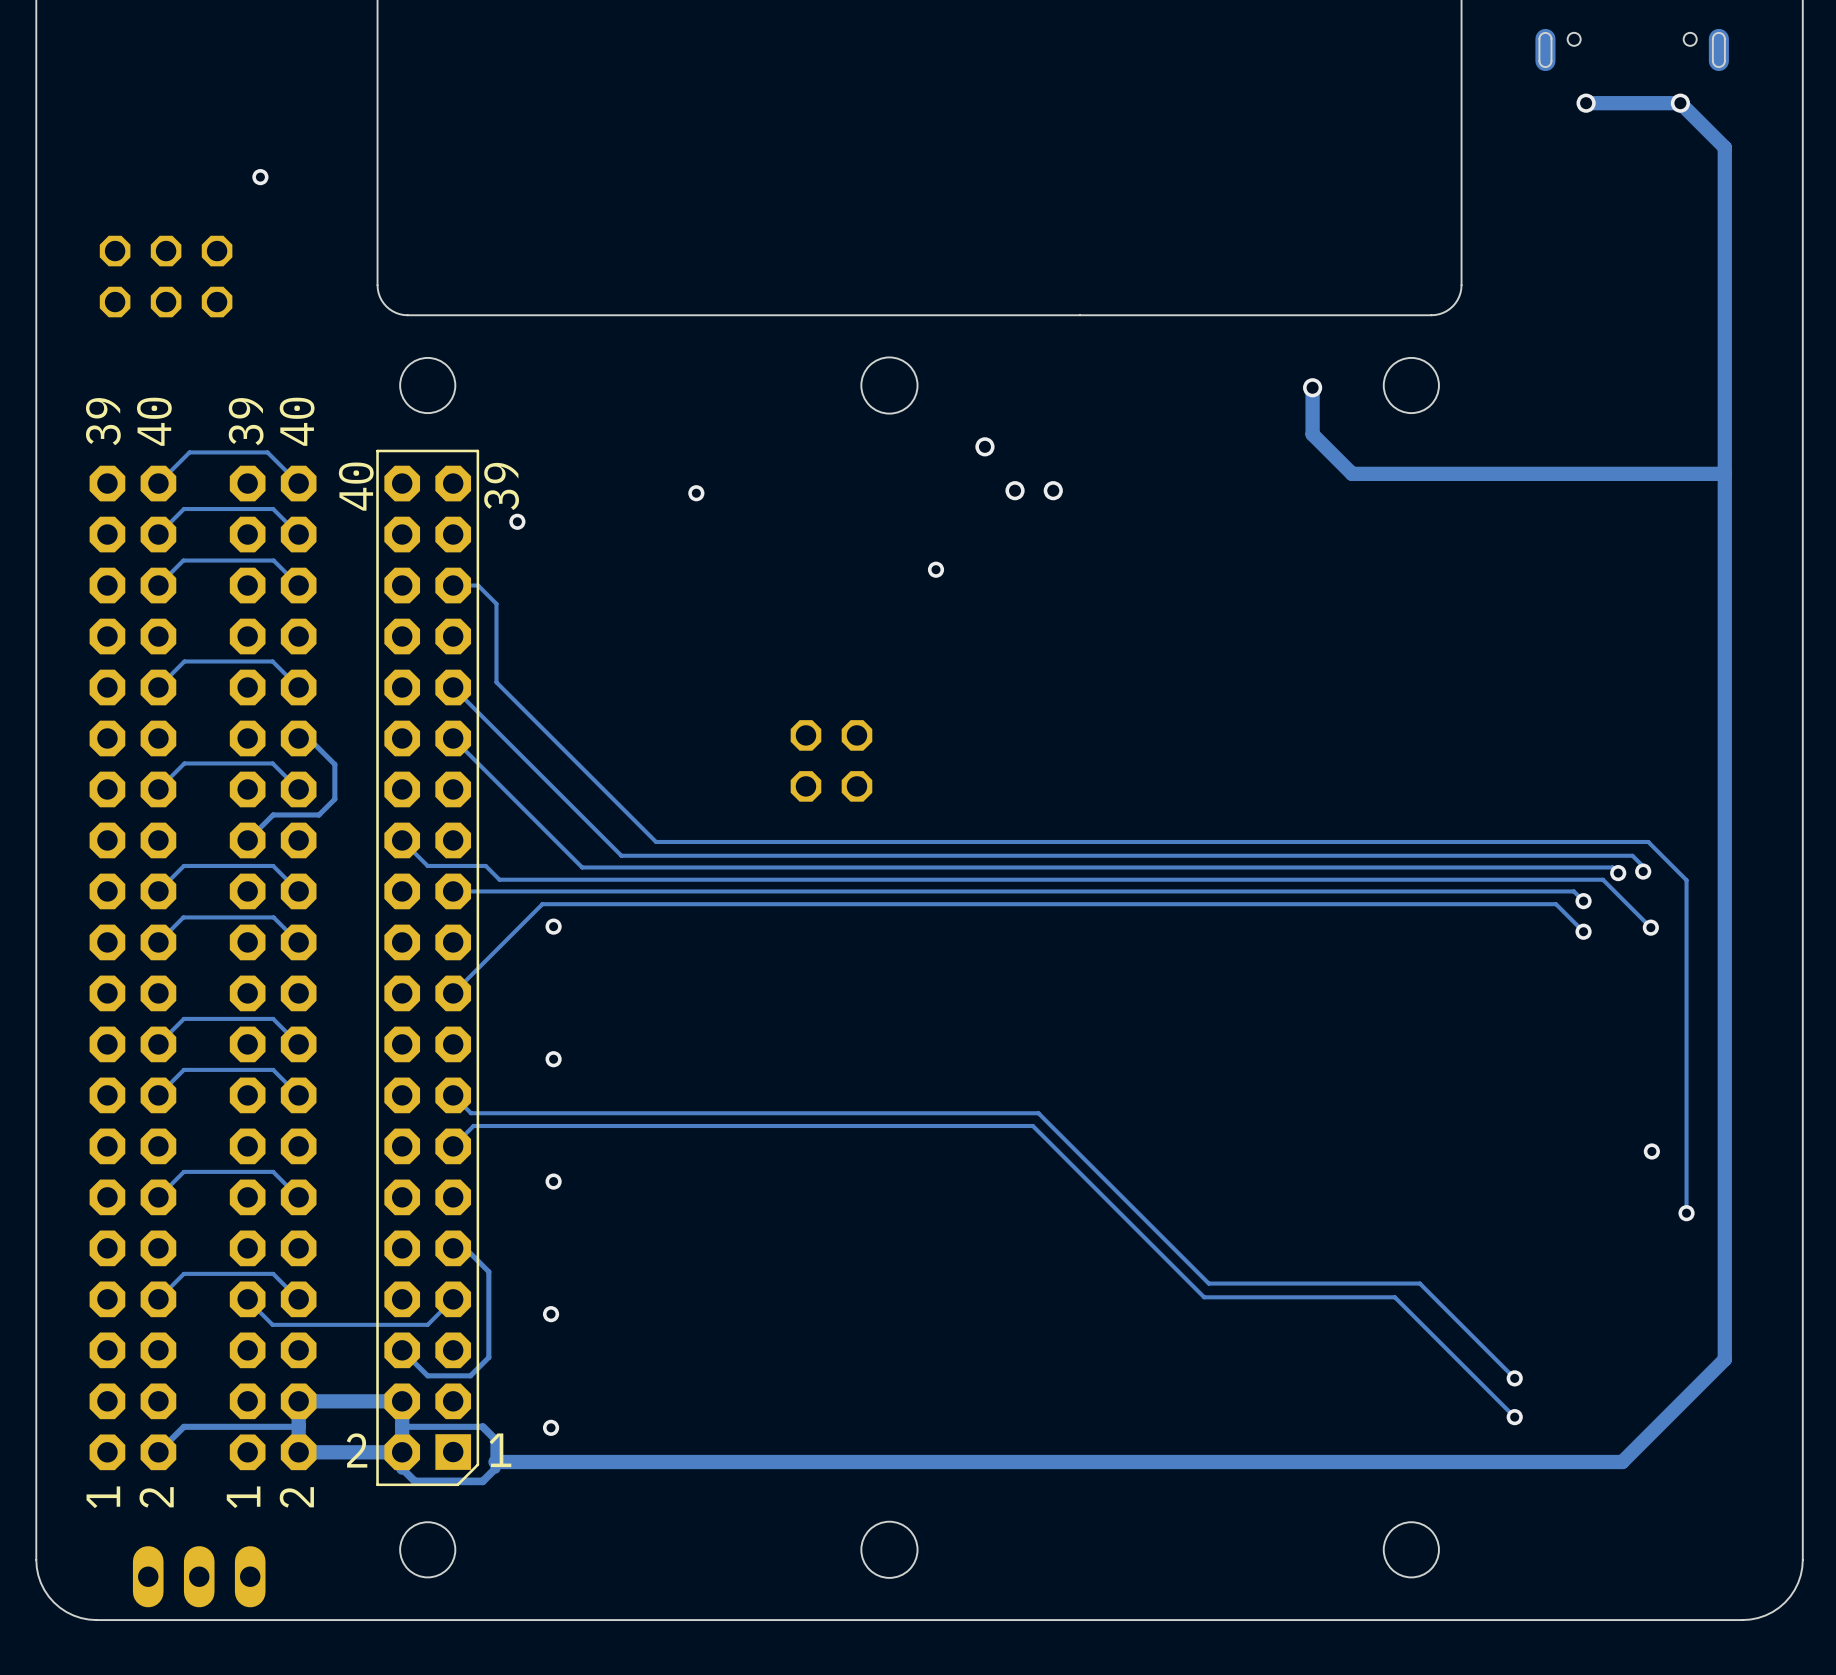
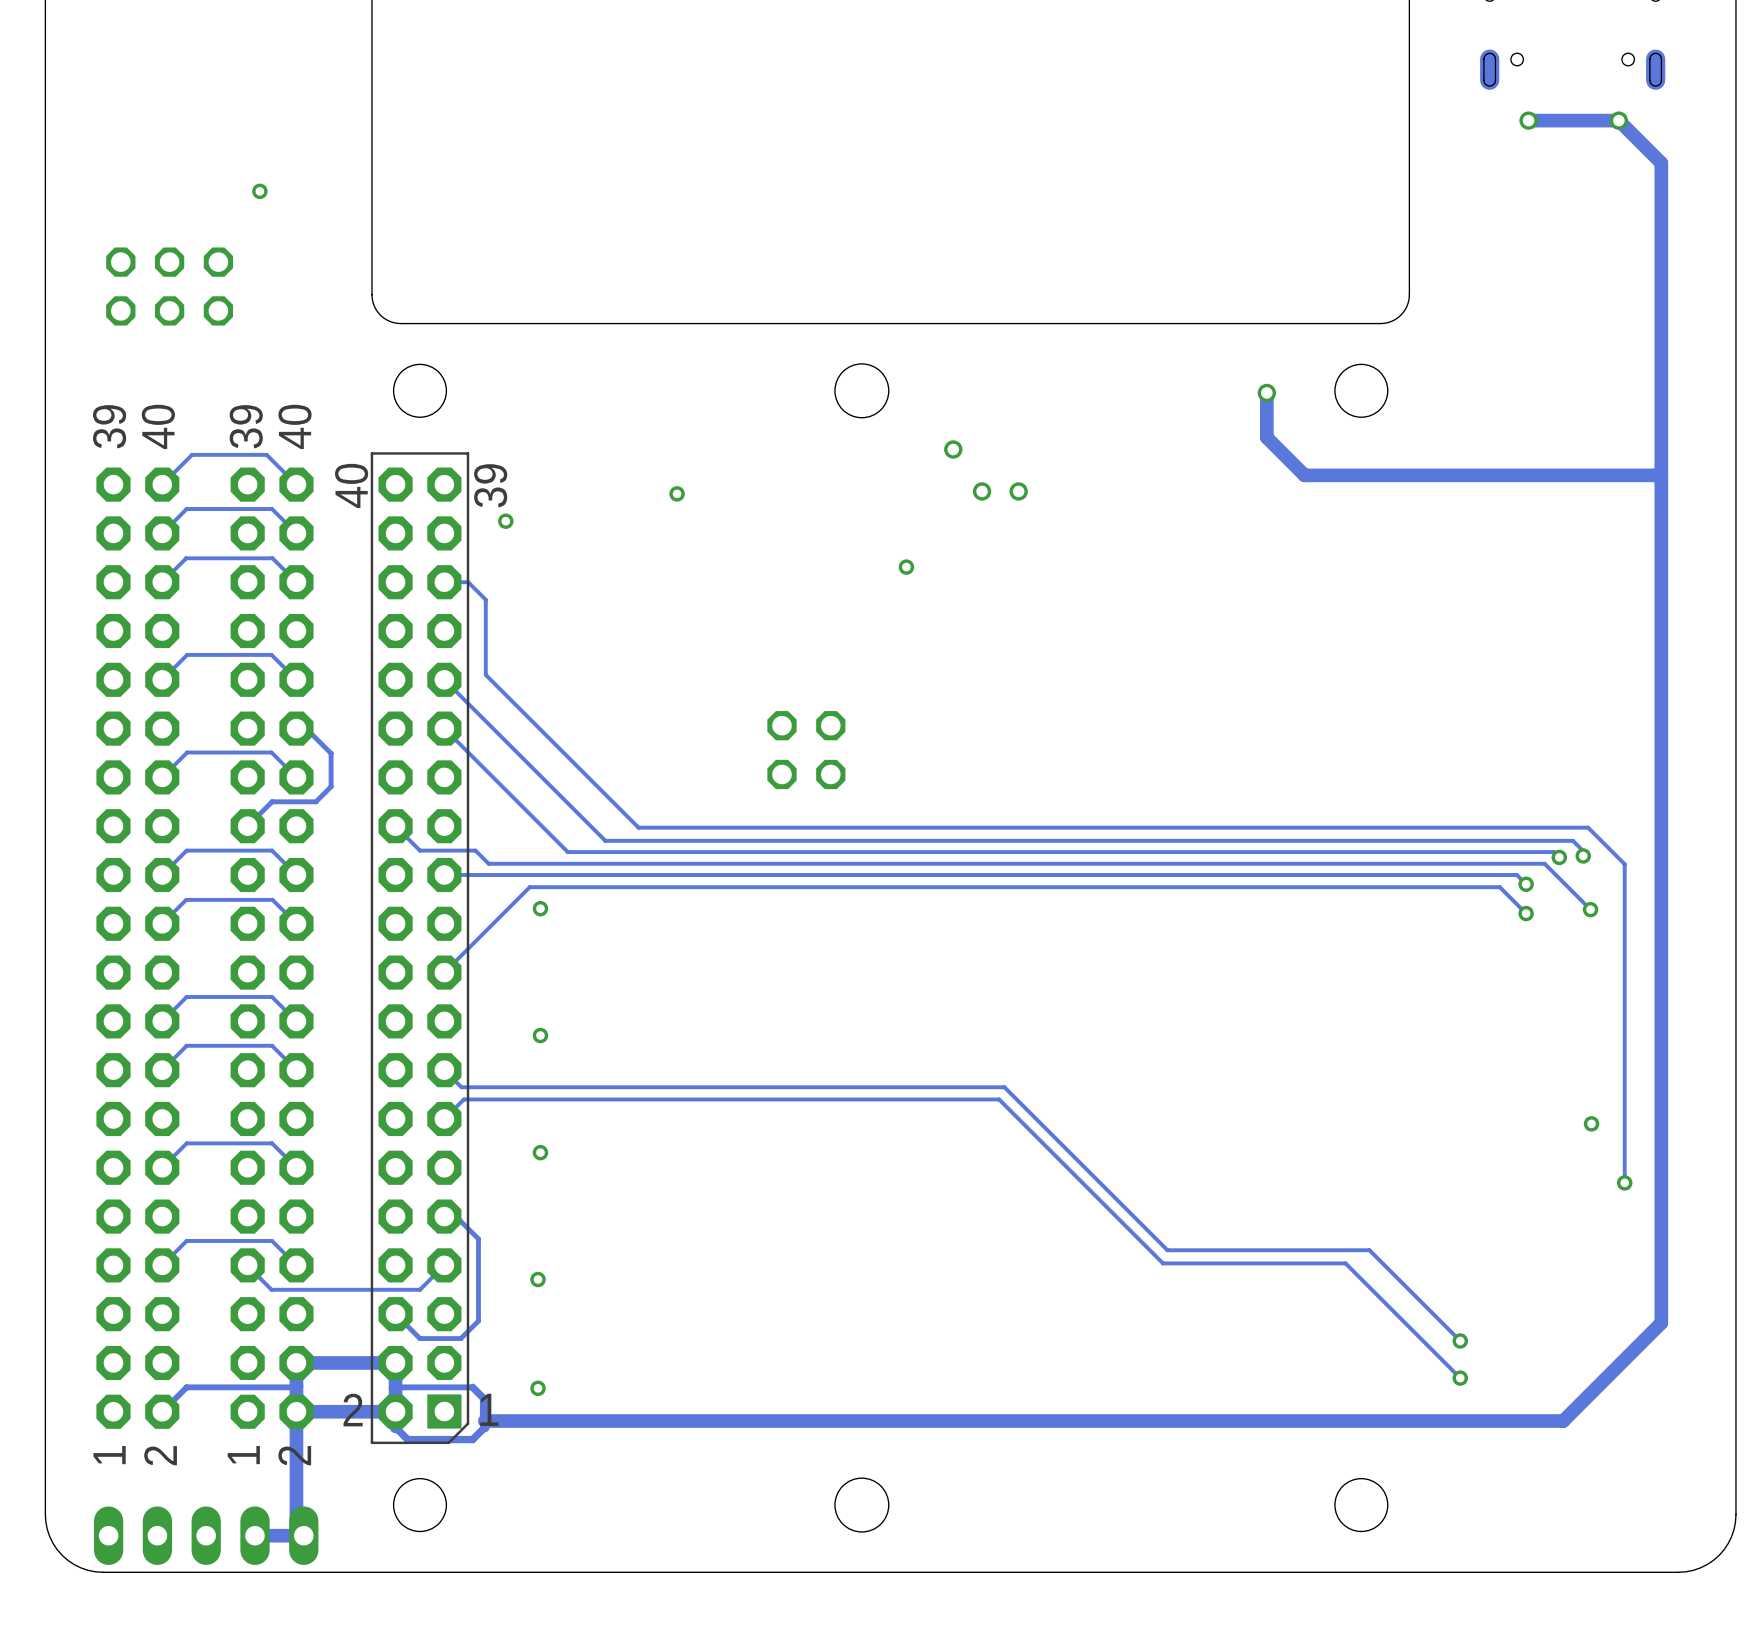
track: none -> (296, 1411) (296, 1528) (303, 1535) (254, 1535)
part footprint: [132, 1546, 266, 1608] -> [93, 1506, 319, 1565]

